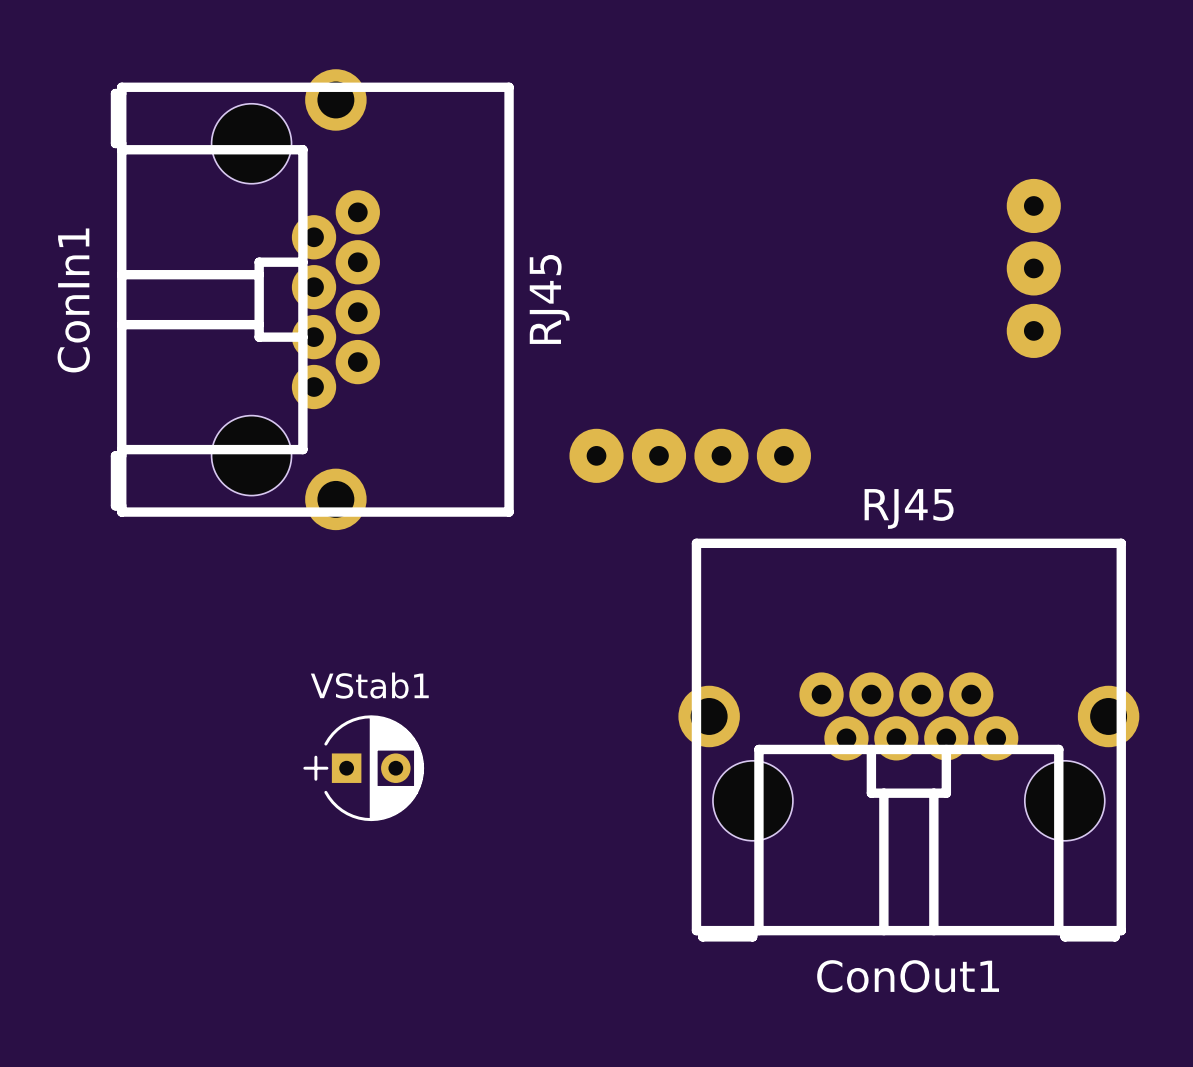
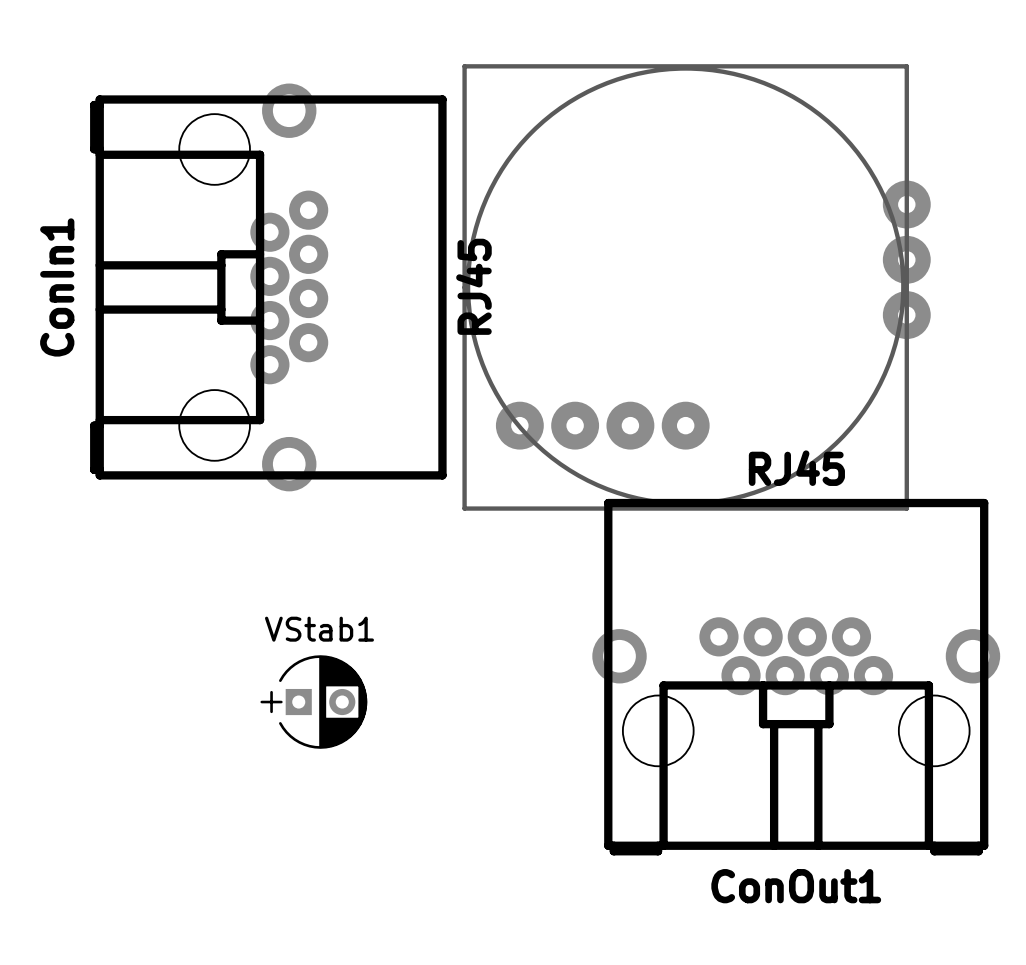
line: none -> (464, 66) (464, 508) (906, 508) (906, 66) (464, 66)
drawing: none -> [465, 66, 906, 506]

